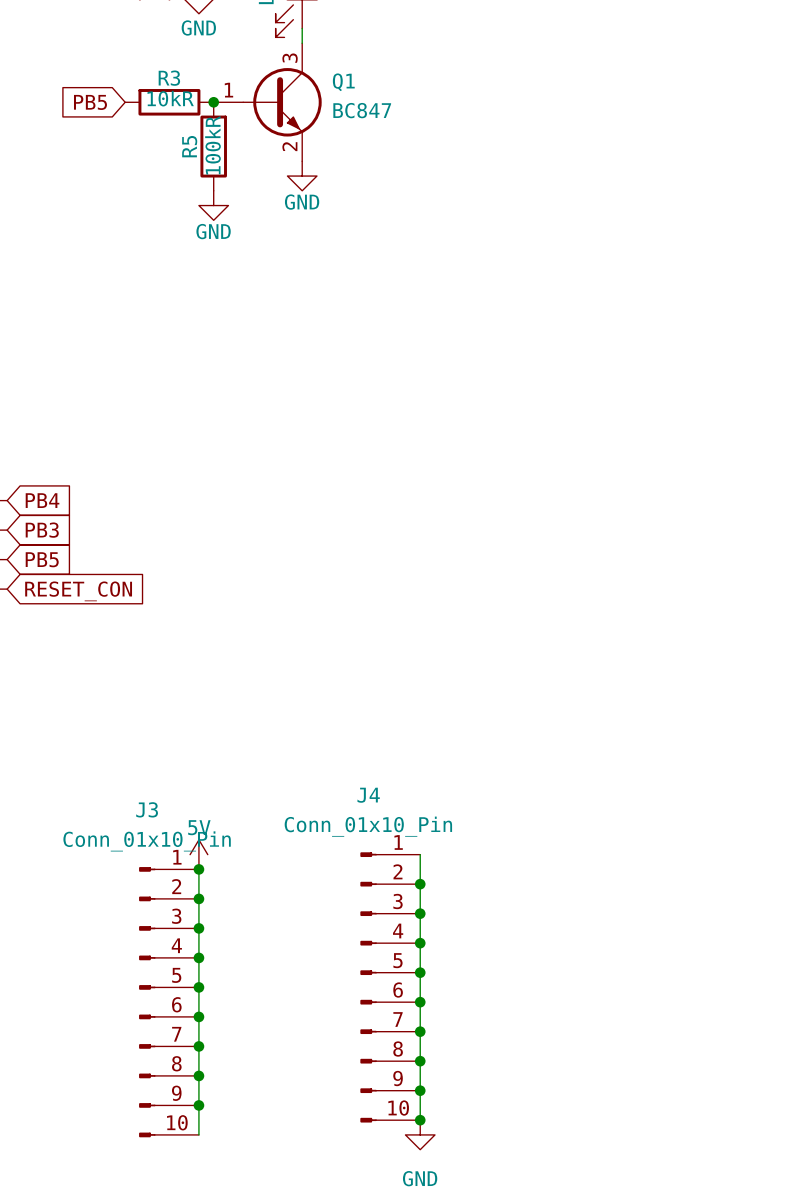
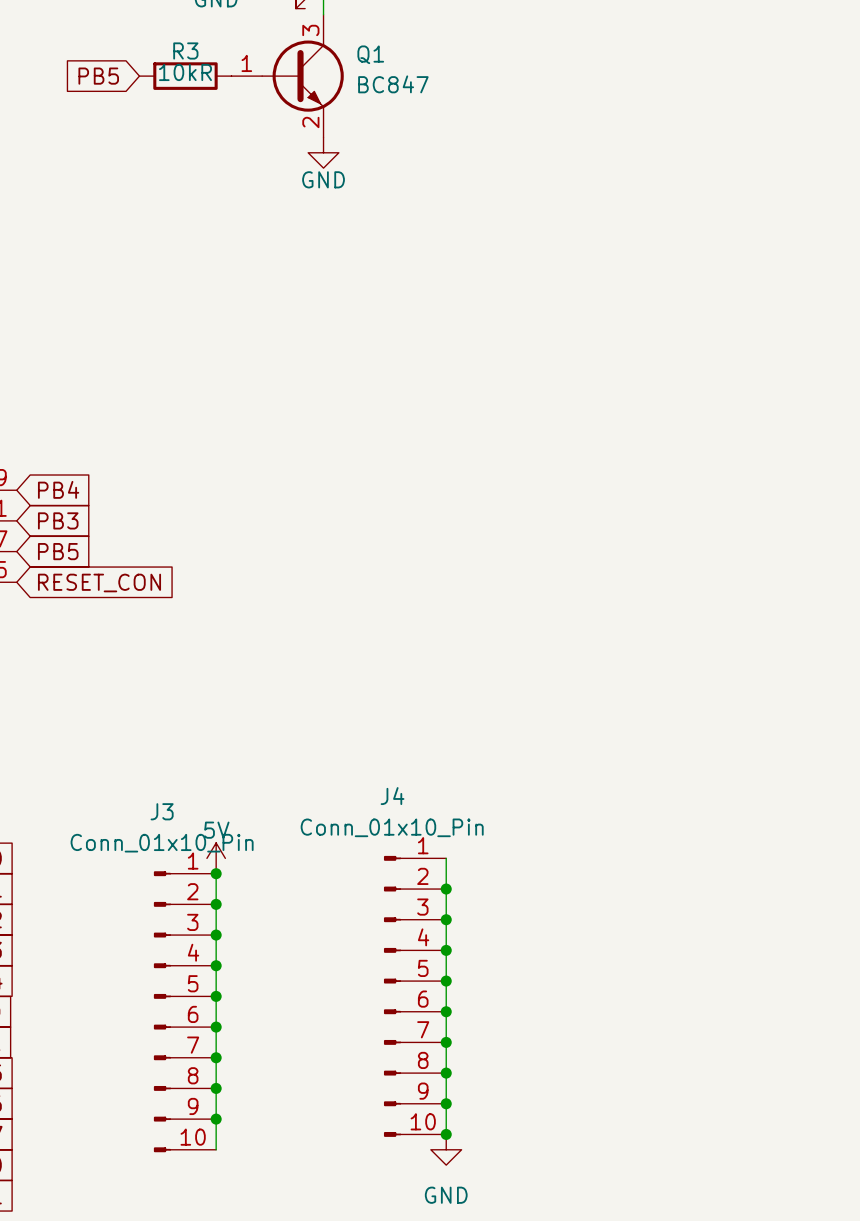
junction: (213, 102) -> none
R5: 100kR (213, 146) -> none
power symbol: GND (213, 205) -> none

